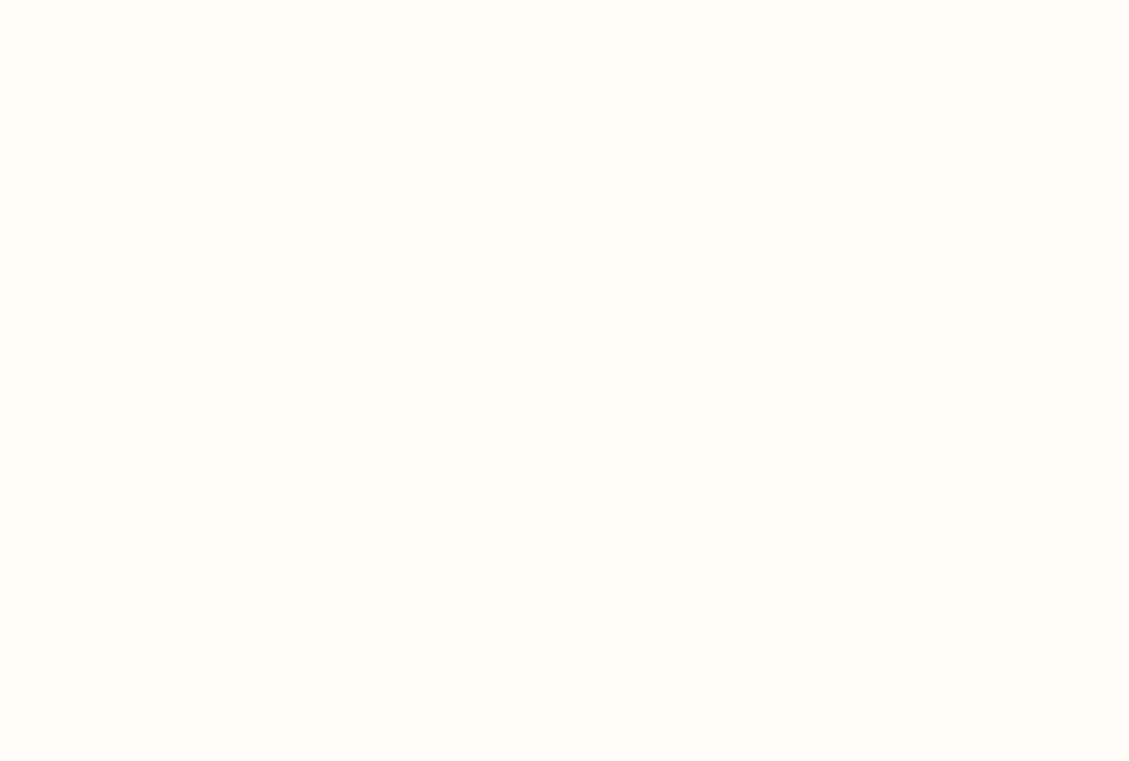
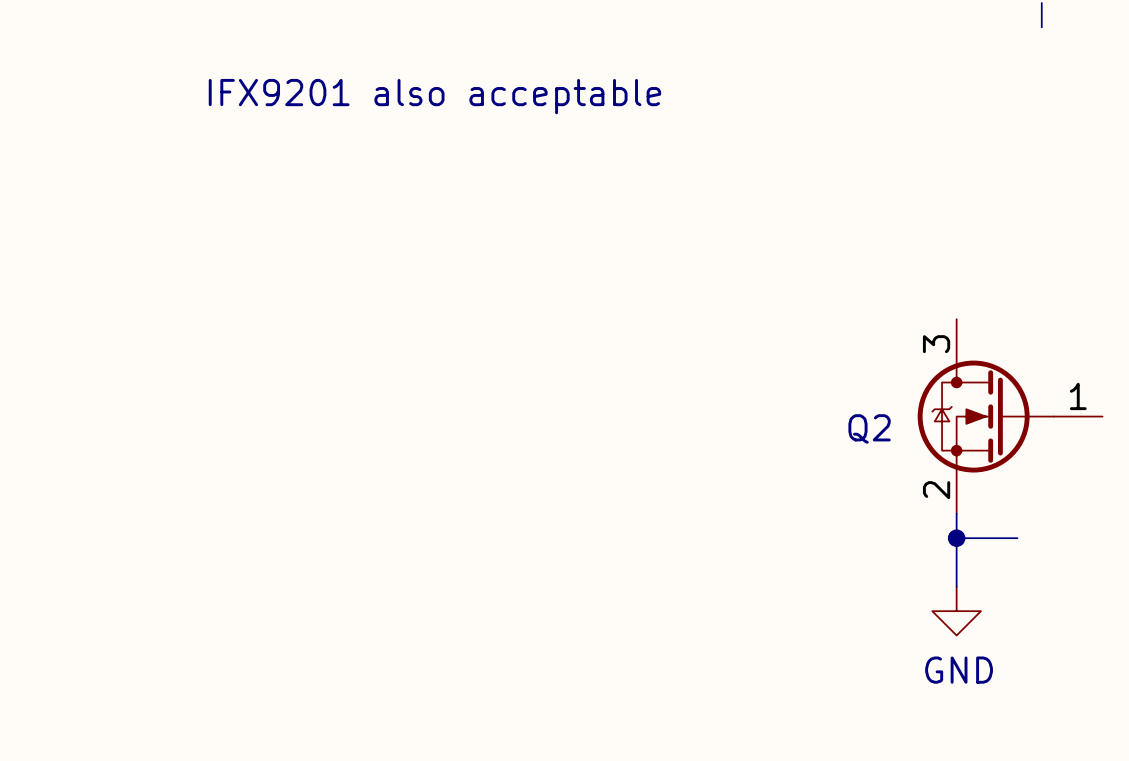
wire: none -> (1041, 3) (1041, 27)
text: none -> IFX9201 also acceptable (434, 96)
Q2: none -> (1010, 416)
wire: none -> (956, 513) (956, 586)
wire: none -> (956, 538) (1017, 538)
junction: none -> (956, 538)
power symbol: none -> GND (956, 611)

